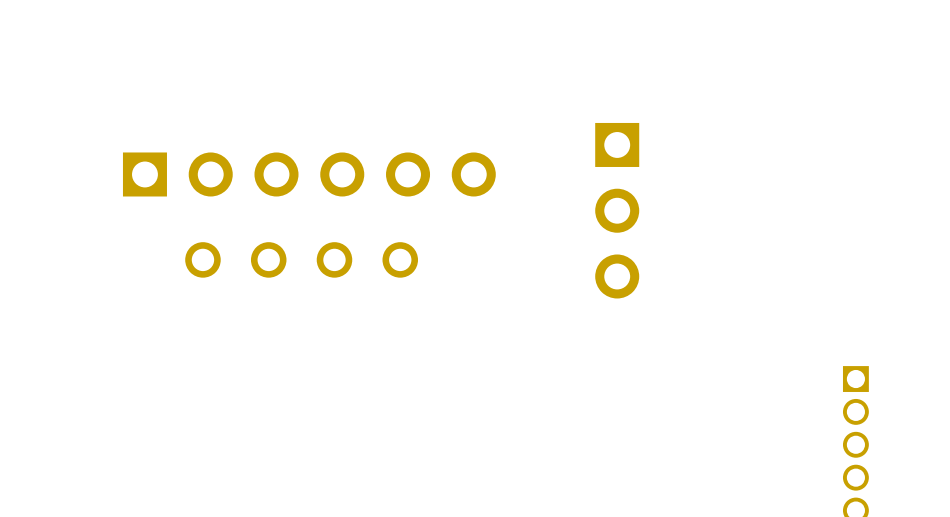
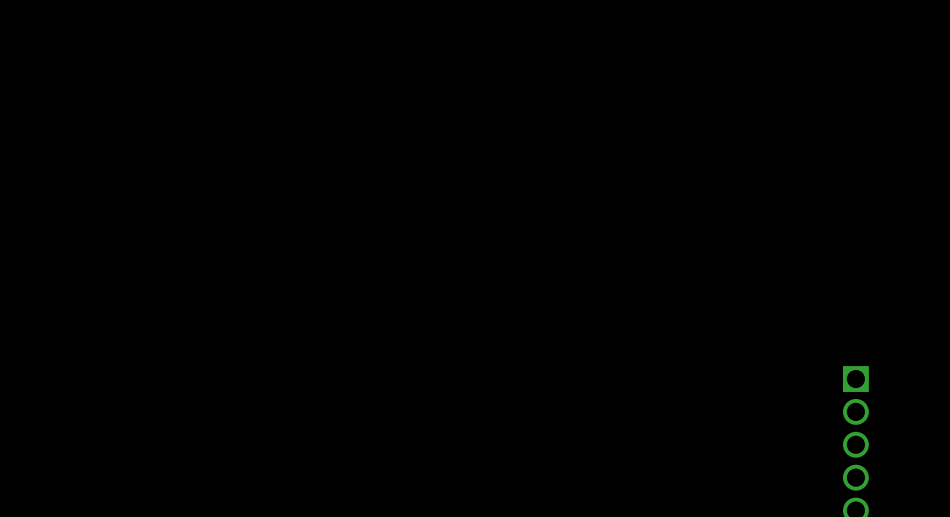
part: (309, 174) -> none
part: (617, 210) -> none
part: (301, 259) -> none

